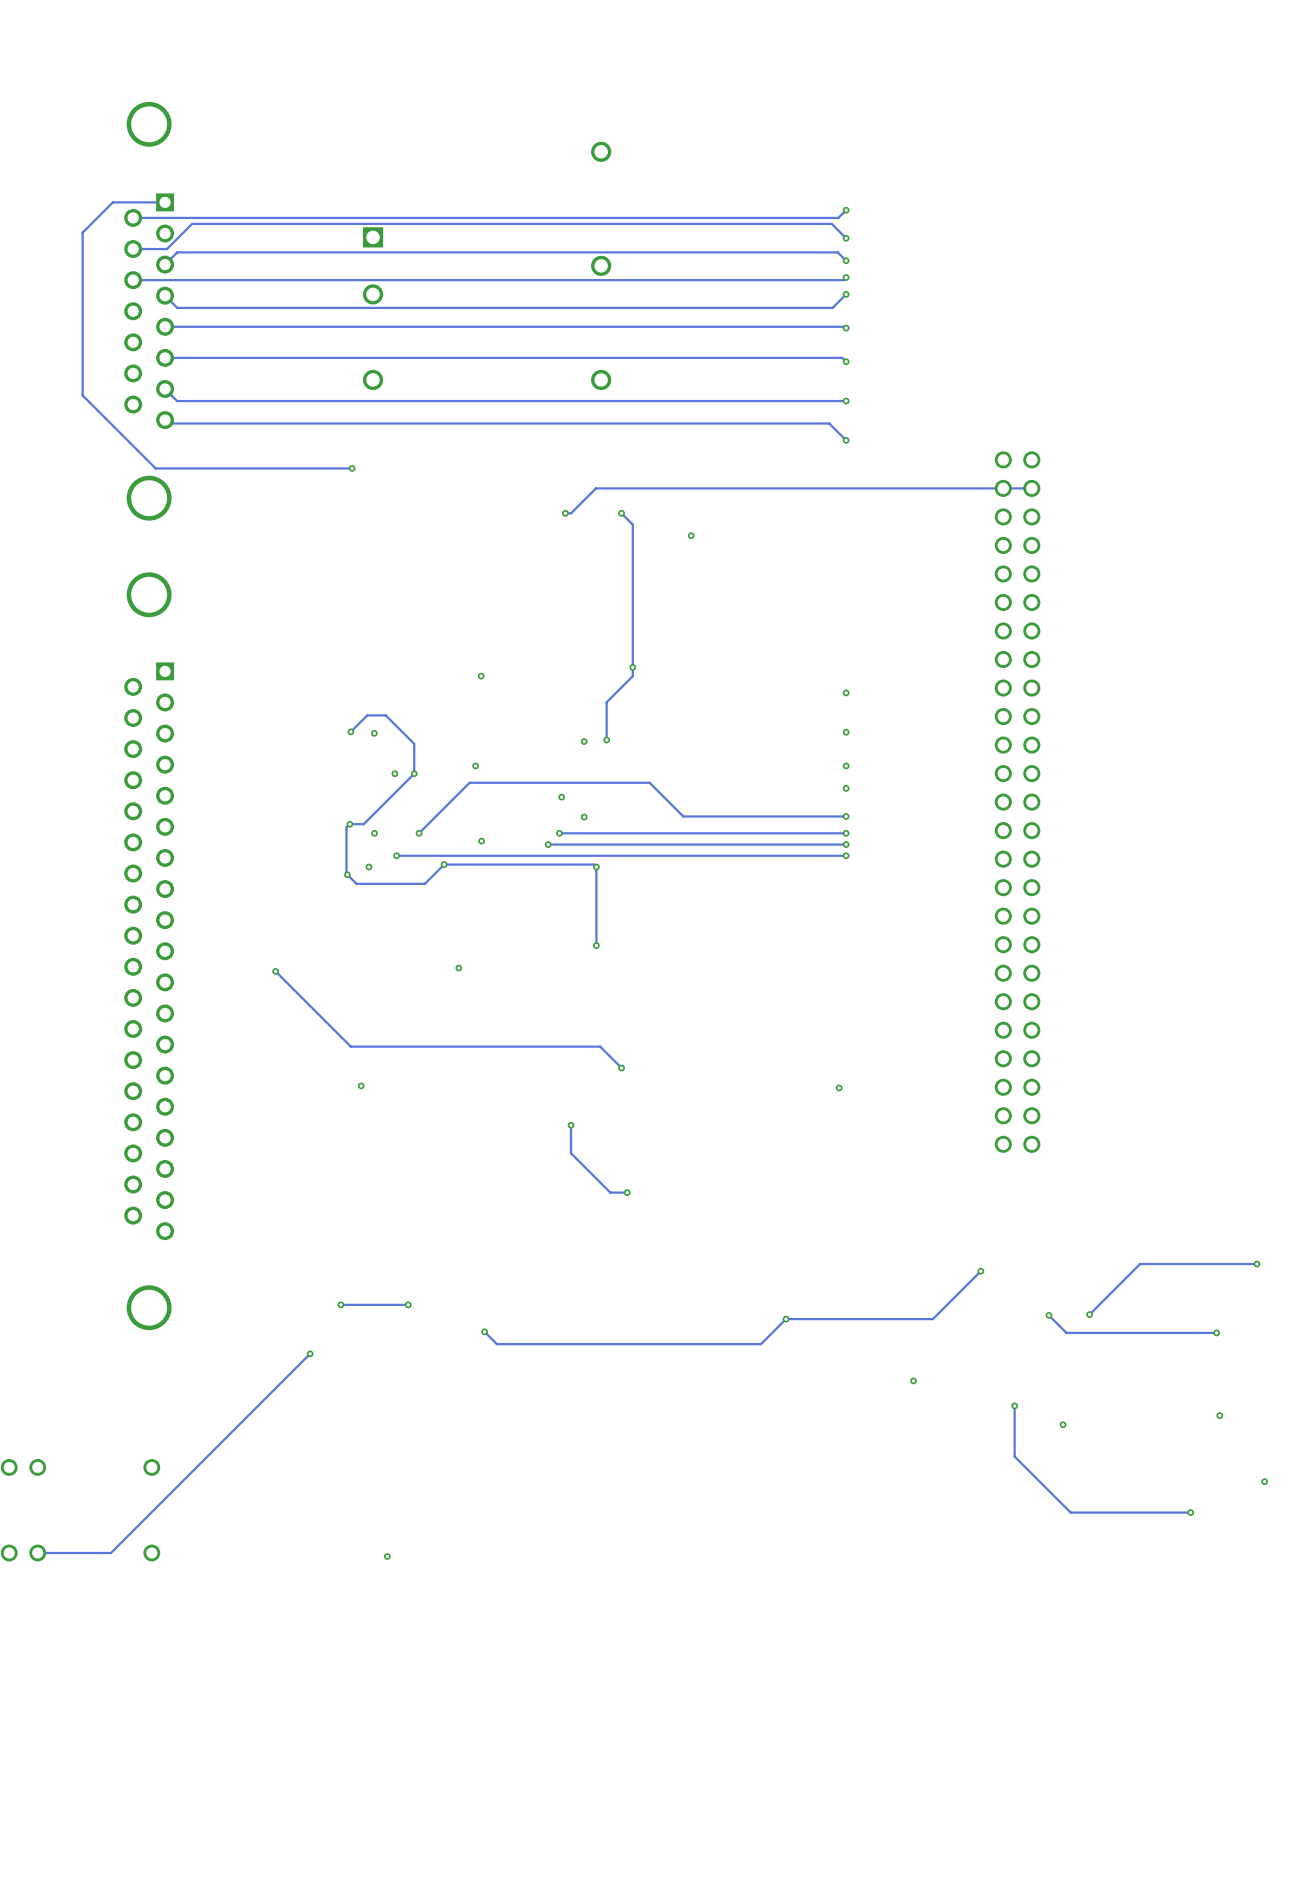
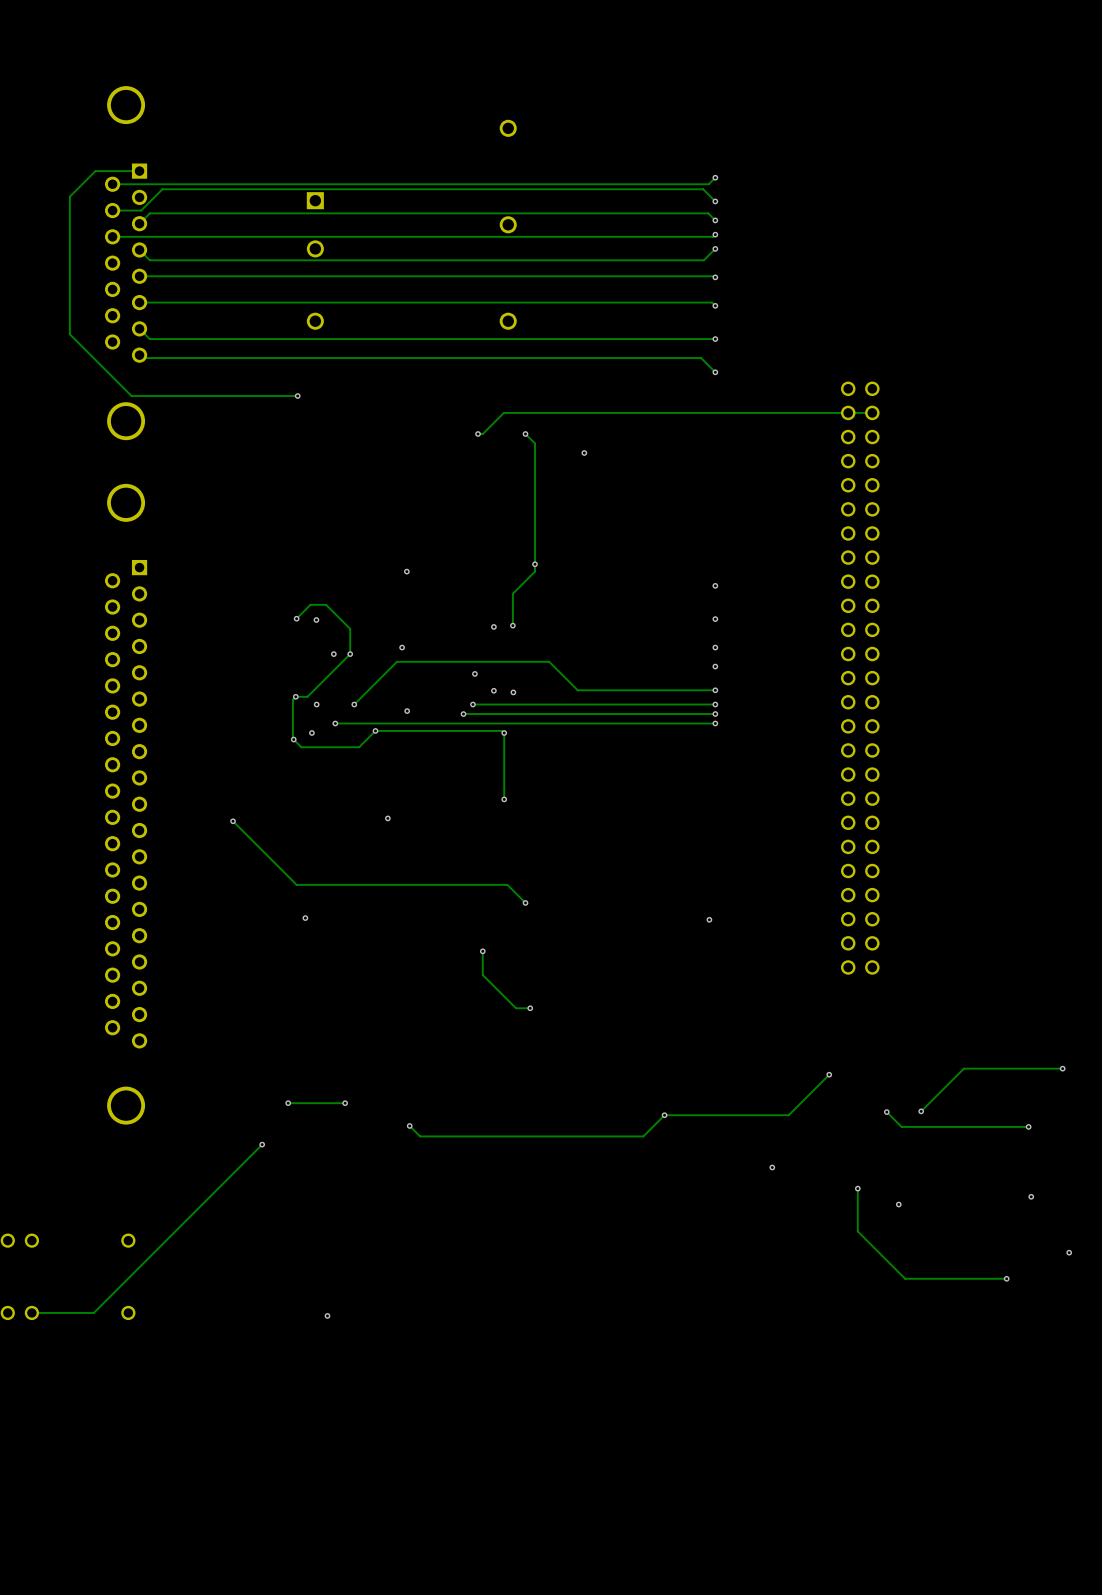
via: none -> (513, 692)

